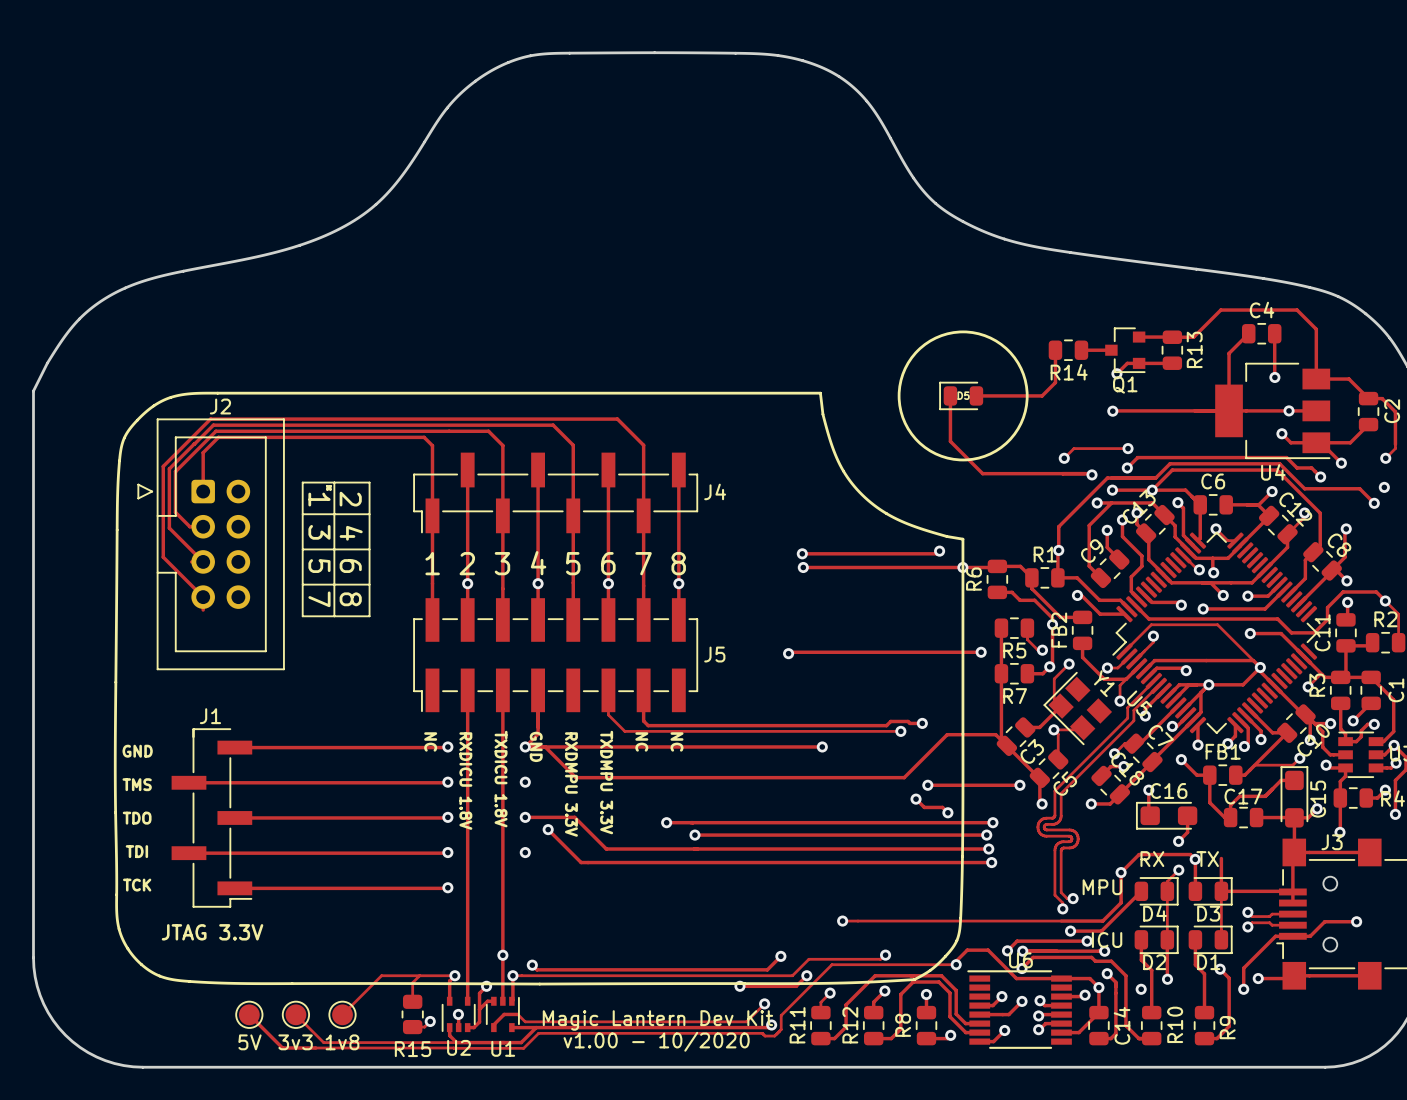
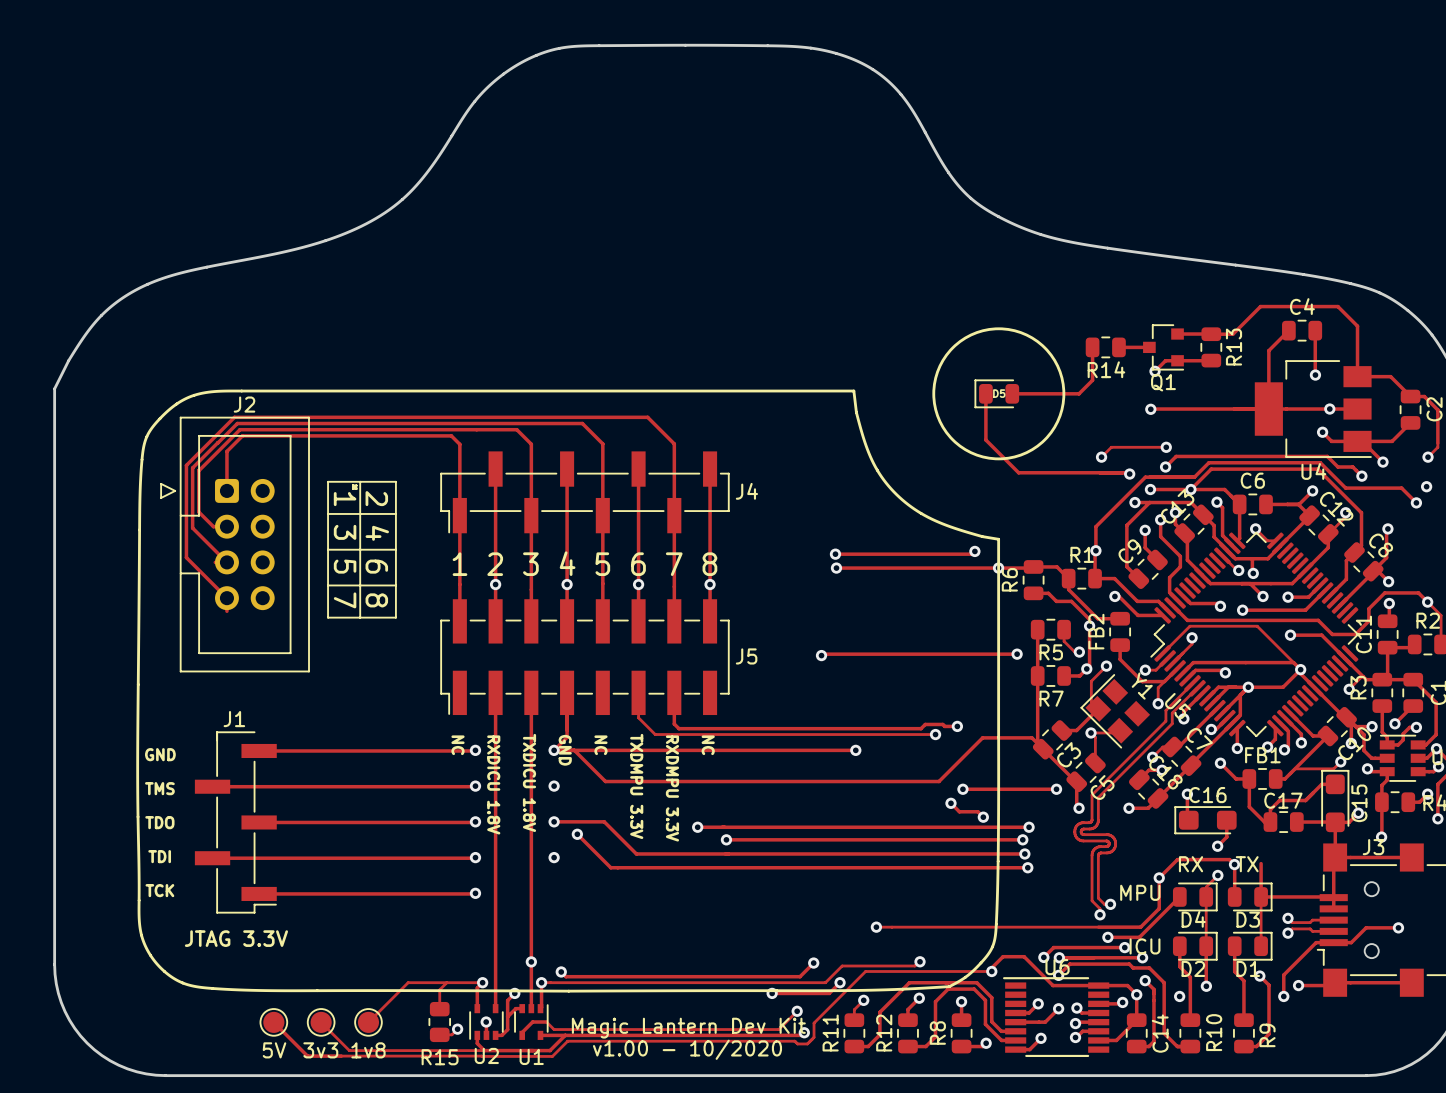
text position: NC (641, 741) -> NC (600, 745)
text position: RXDMPU 3.3V (571, 784) -> RXDMPU 3.3V (672, 788)

